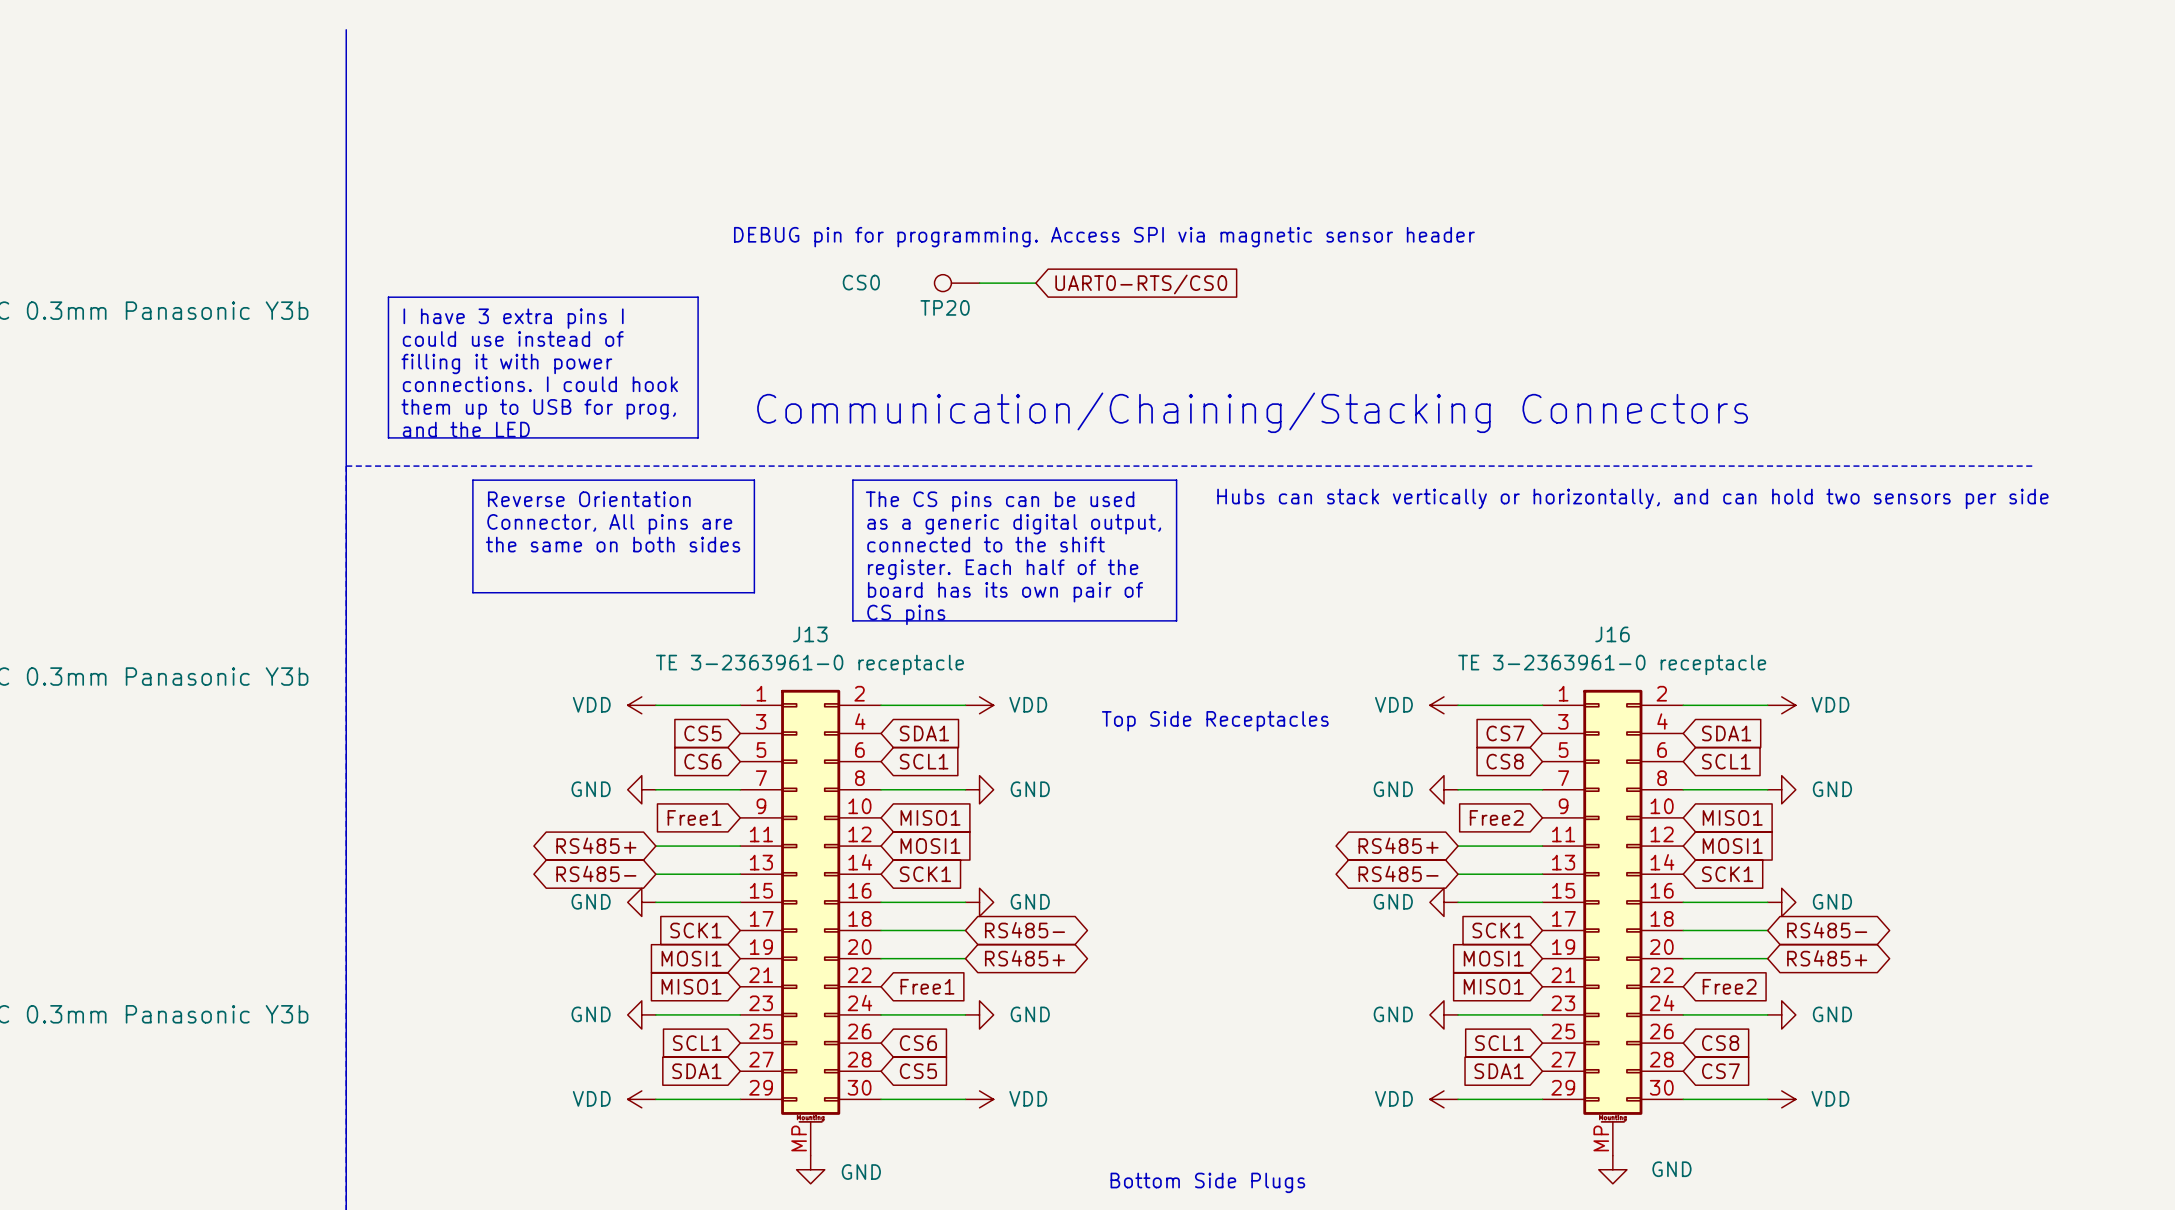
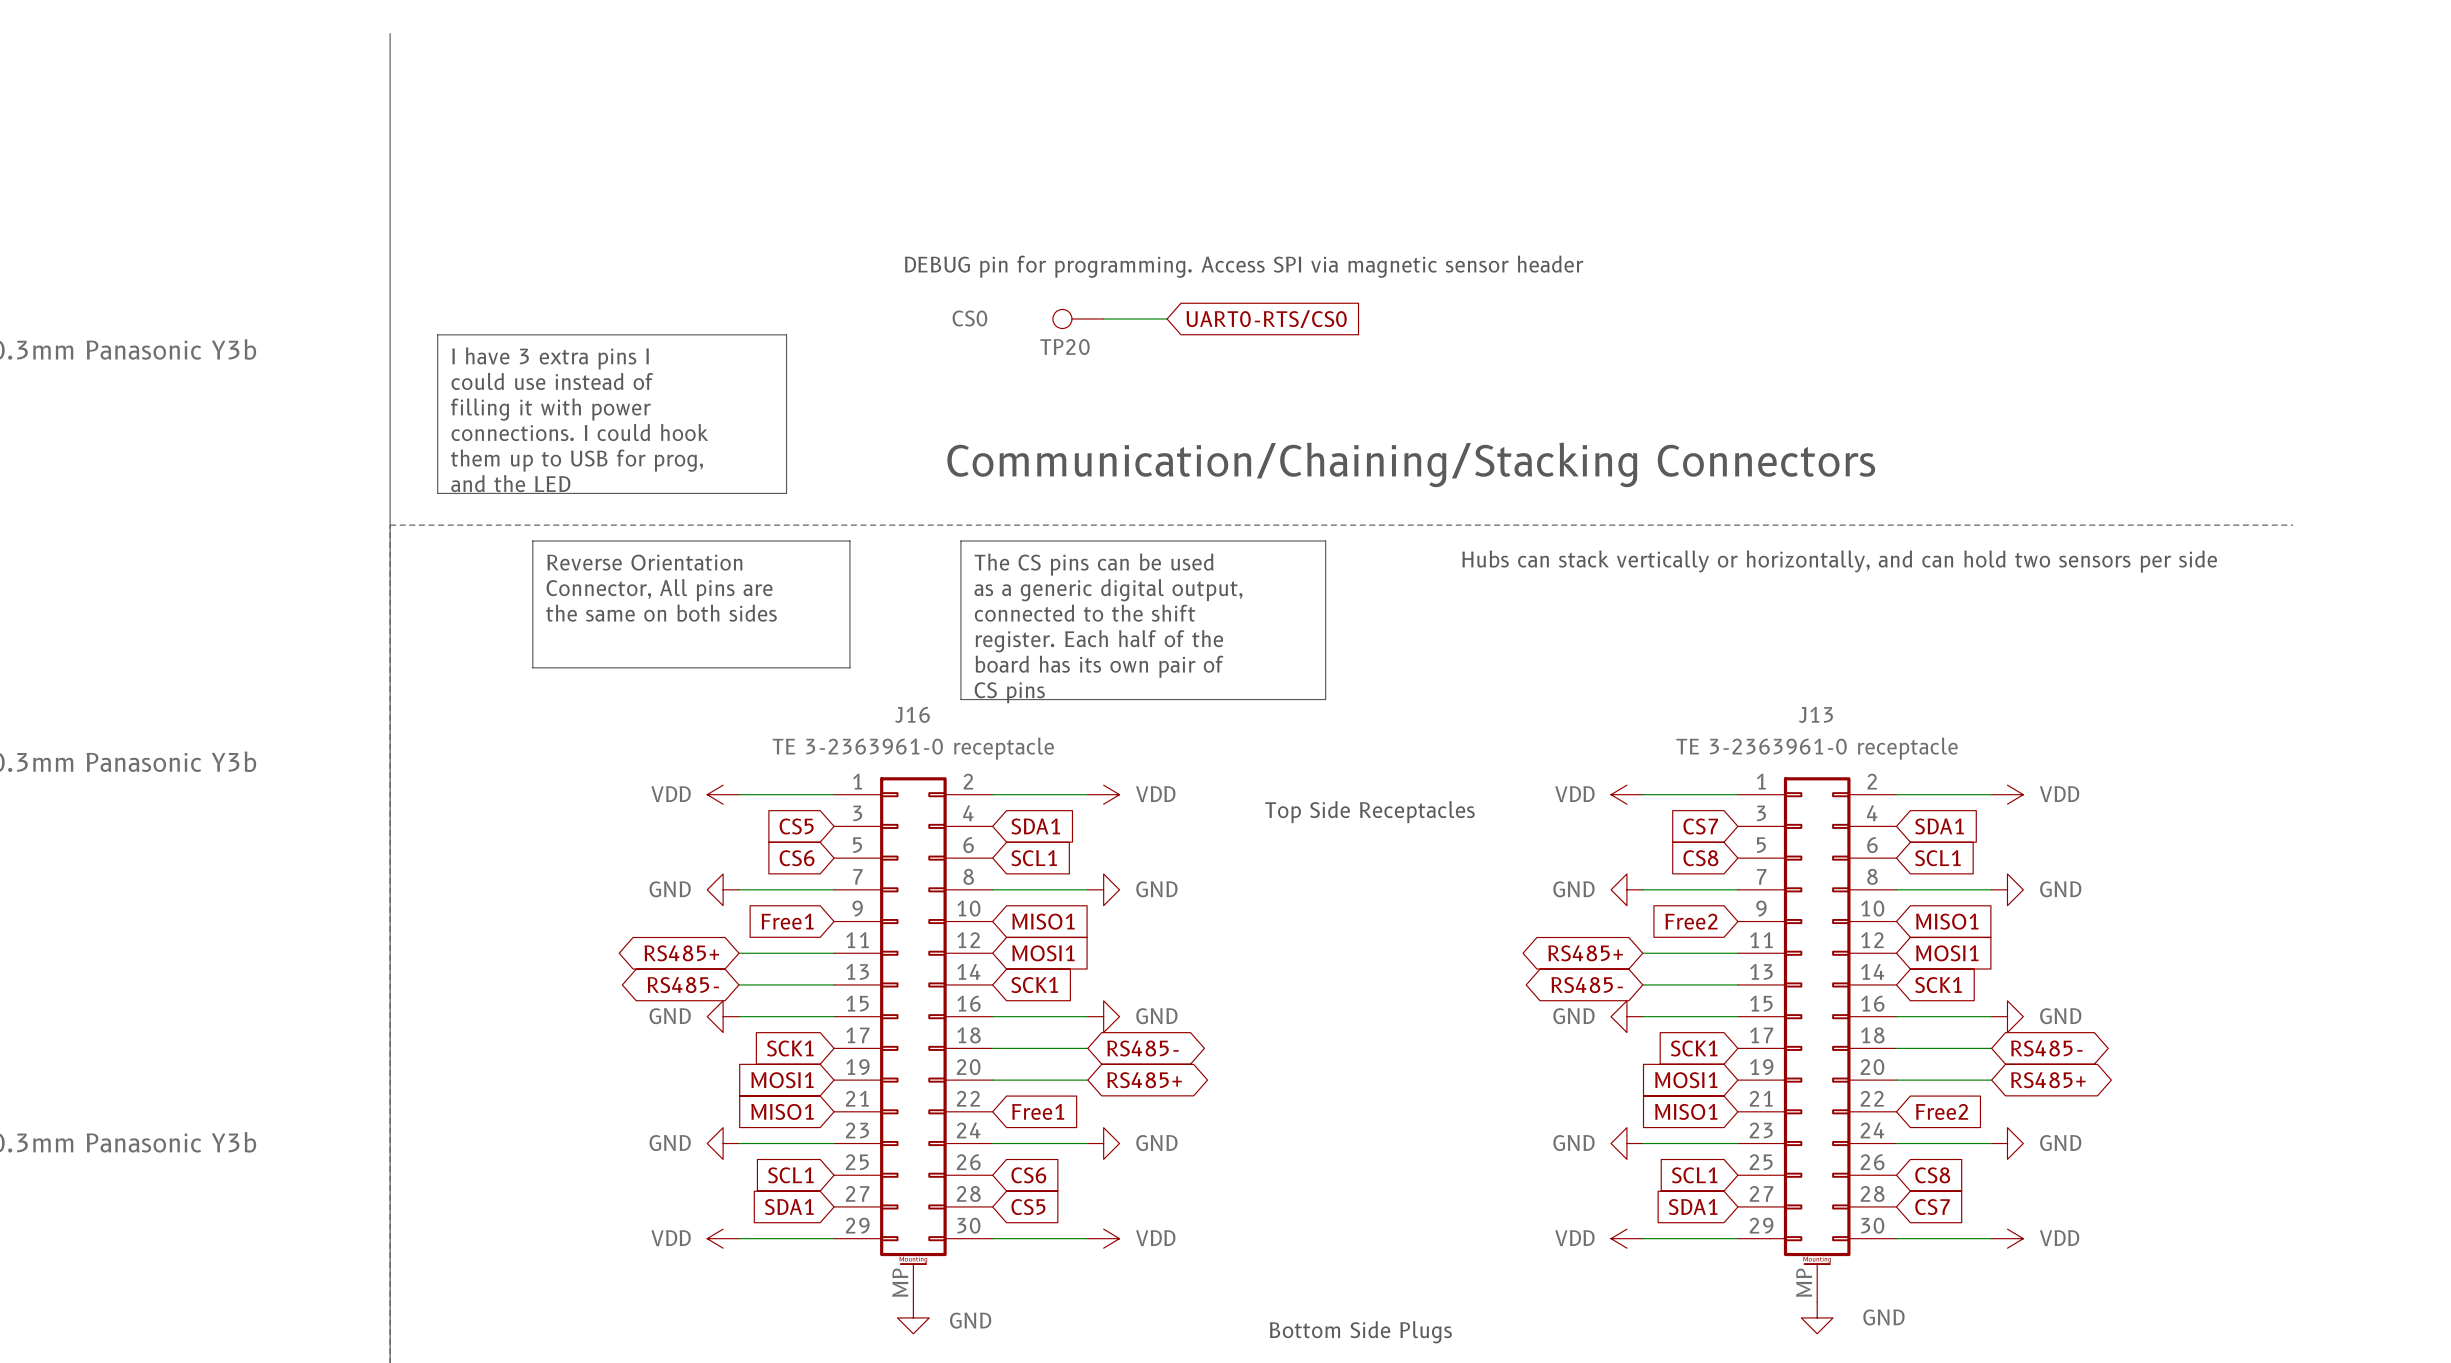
J13 name: J13 (810, 634) -> J16 (912, 714)
J16 name: J16 (1612, 634) -> J13 (1815, 714)

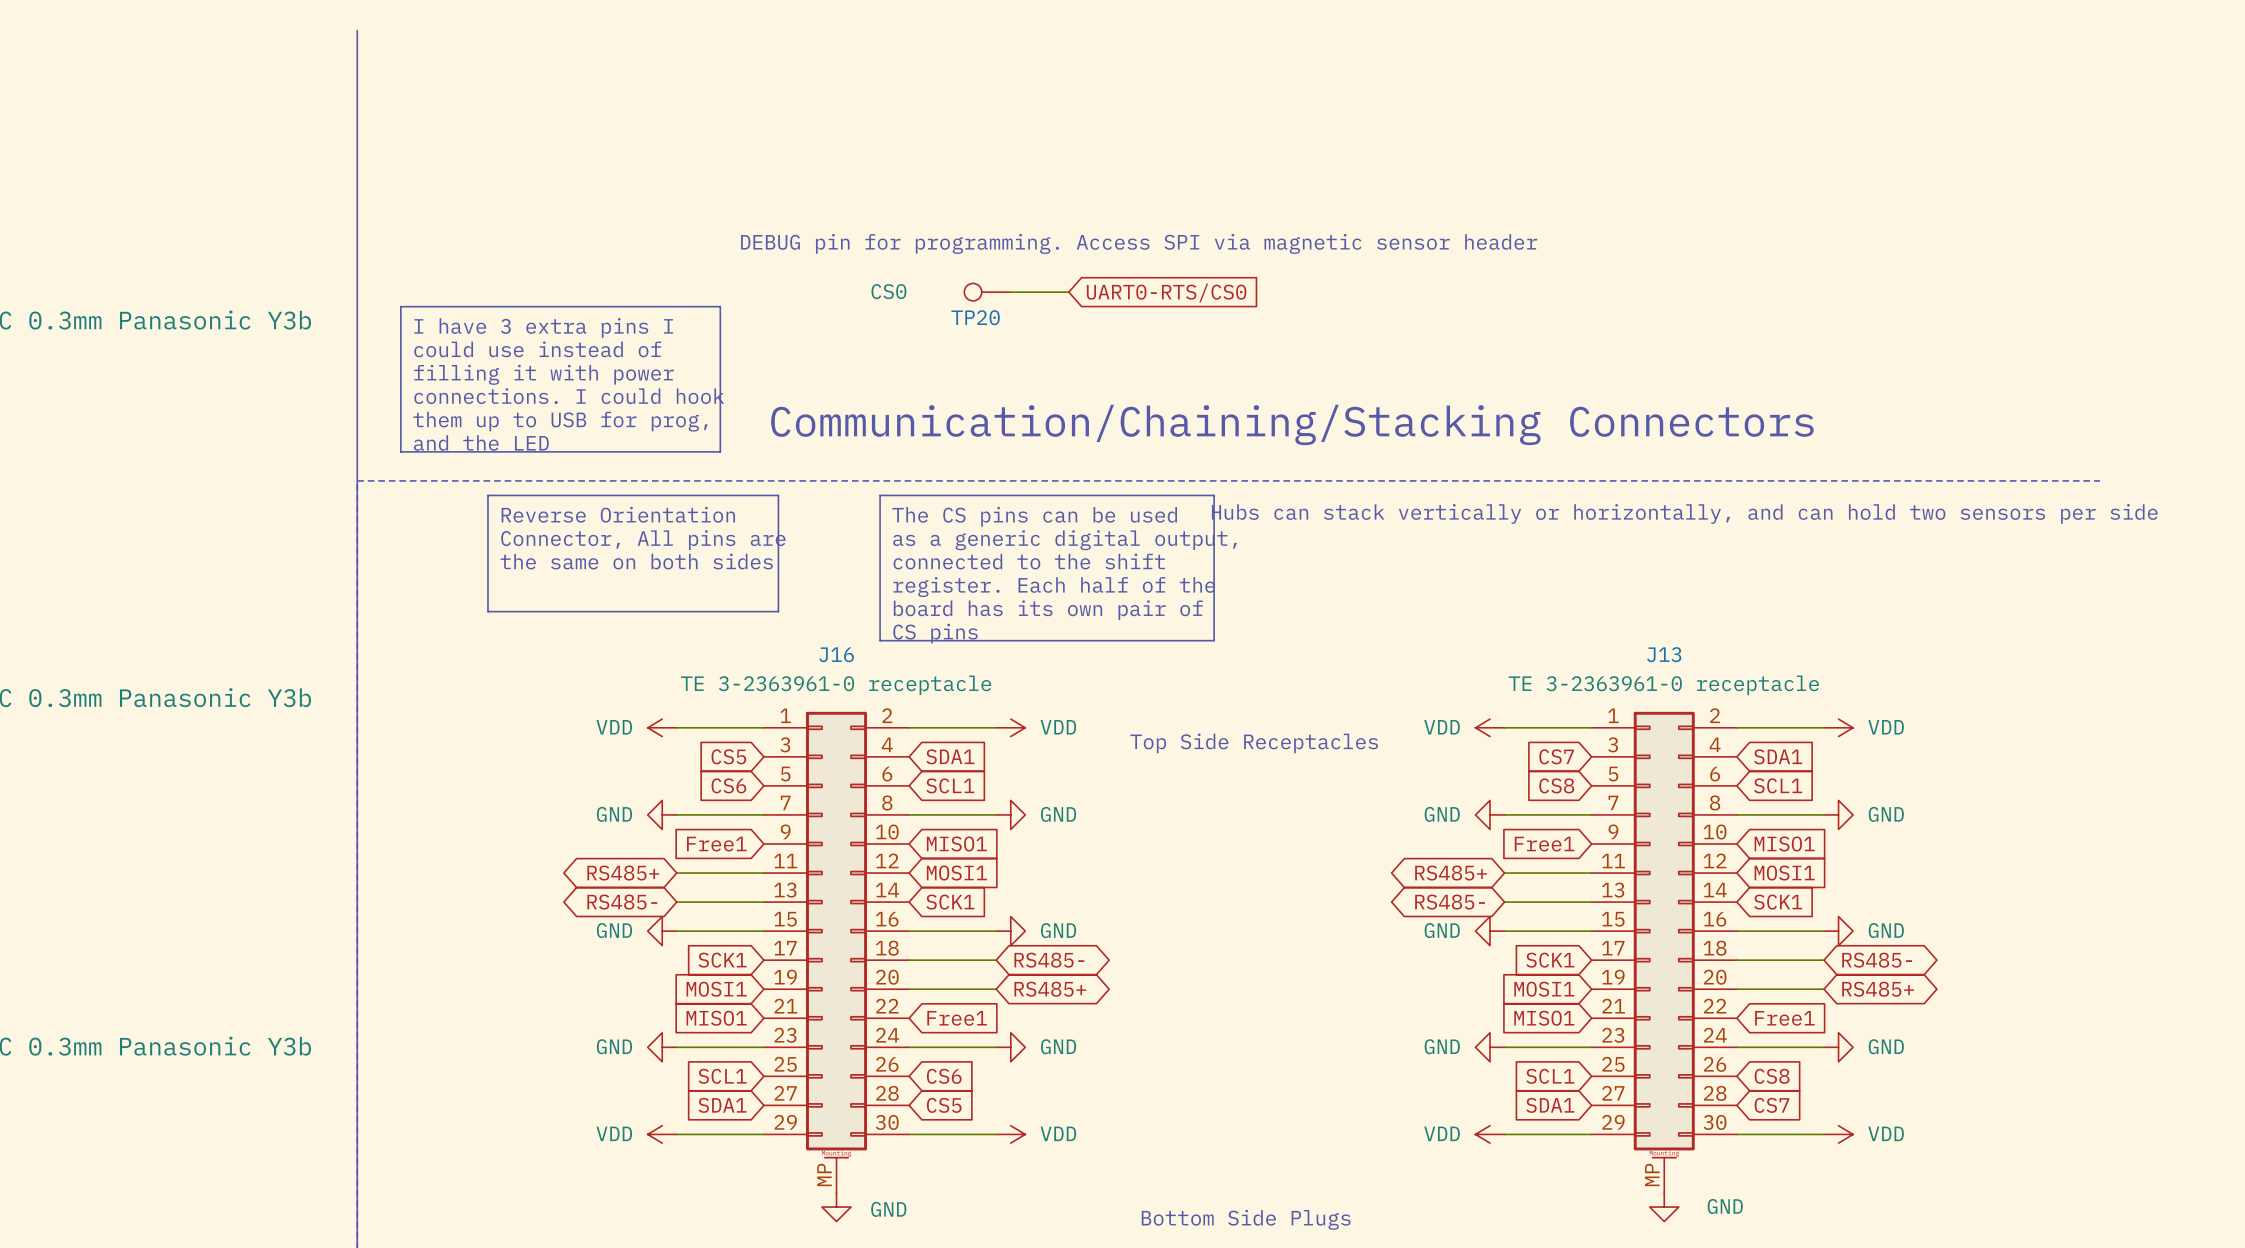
global label: Free2 (1691, 921) -> Free1 (1544, 844)
global label: Free2 (1942, 1111) -> Free1 (1784, 1018)

